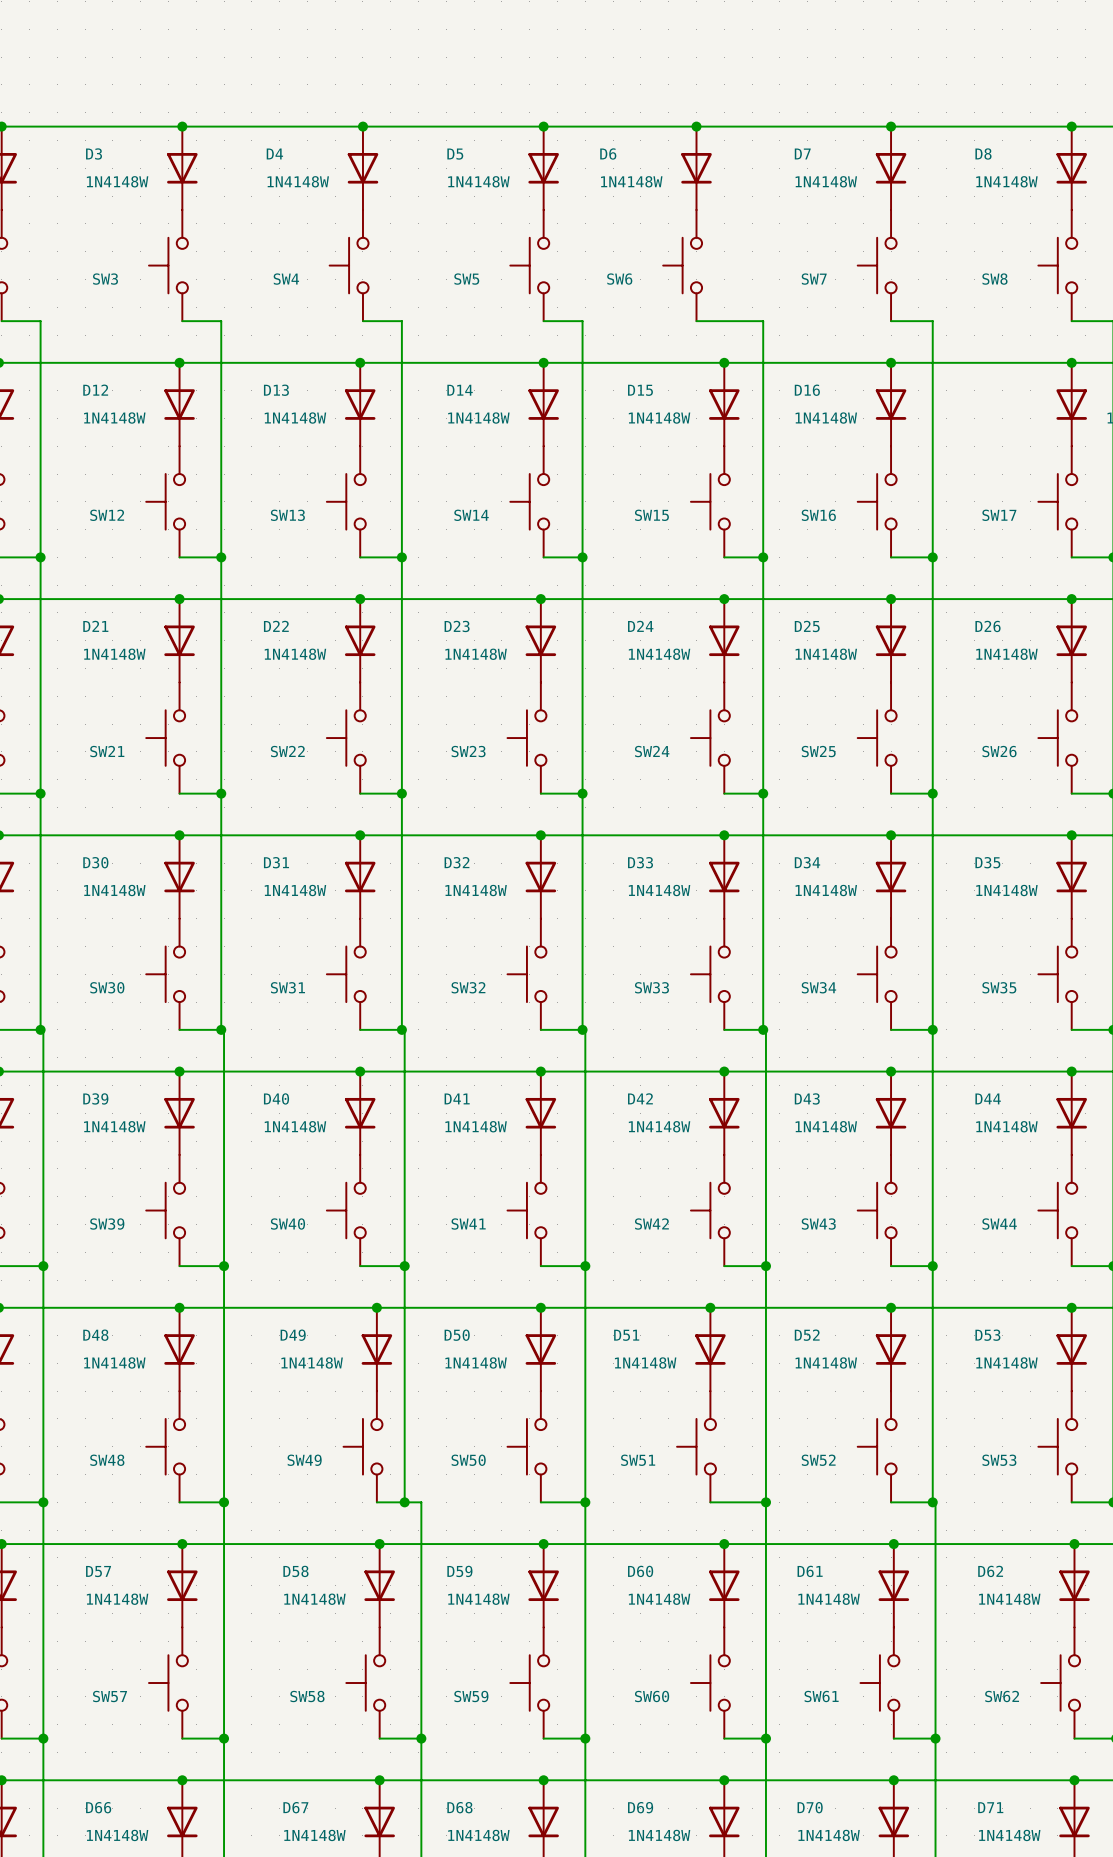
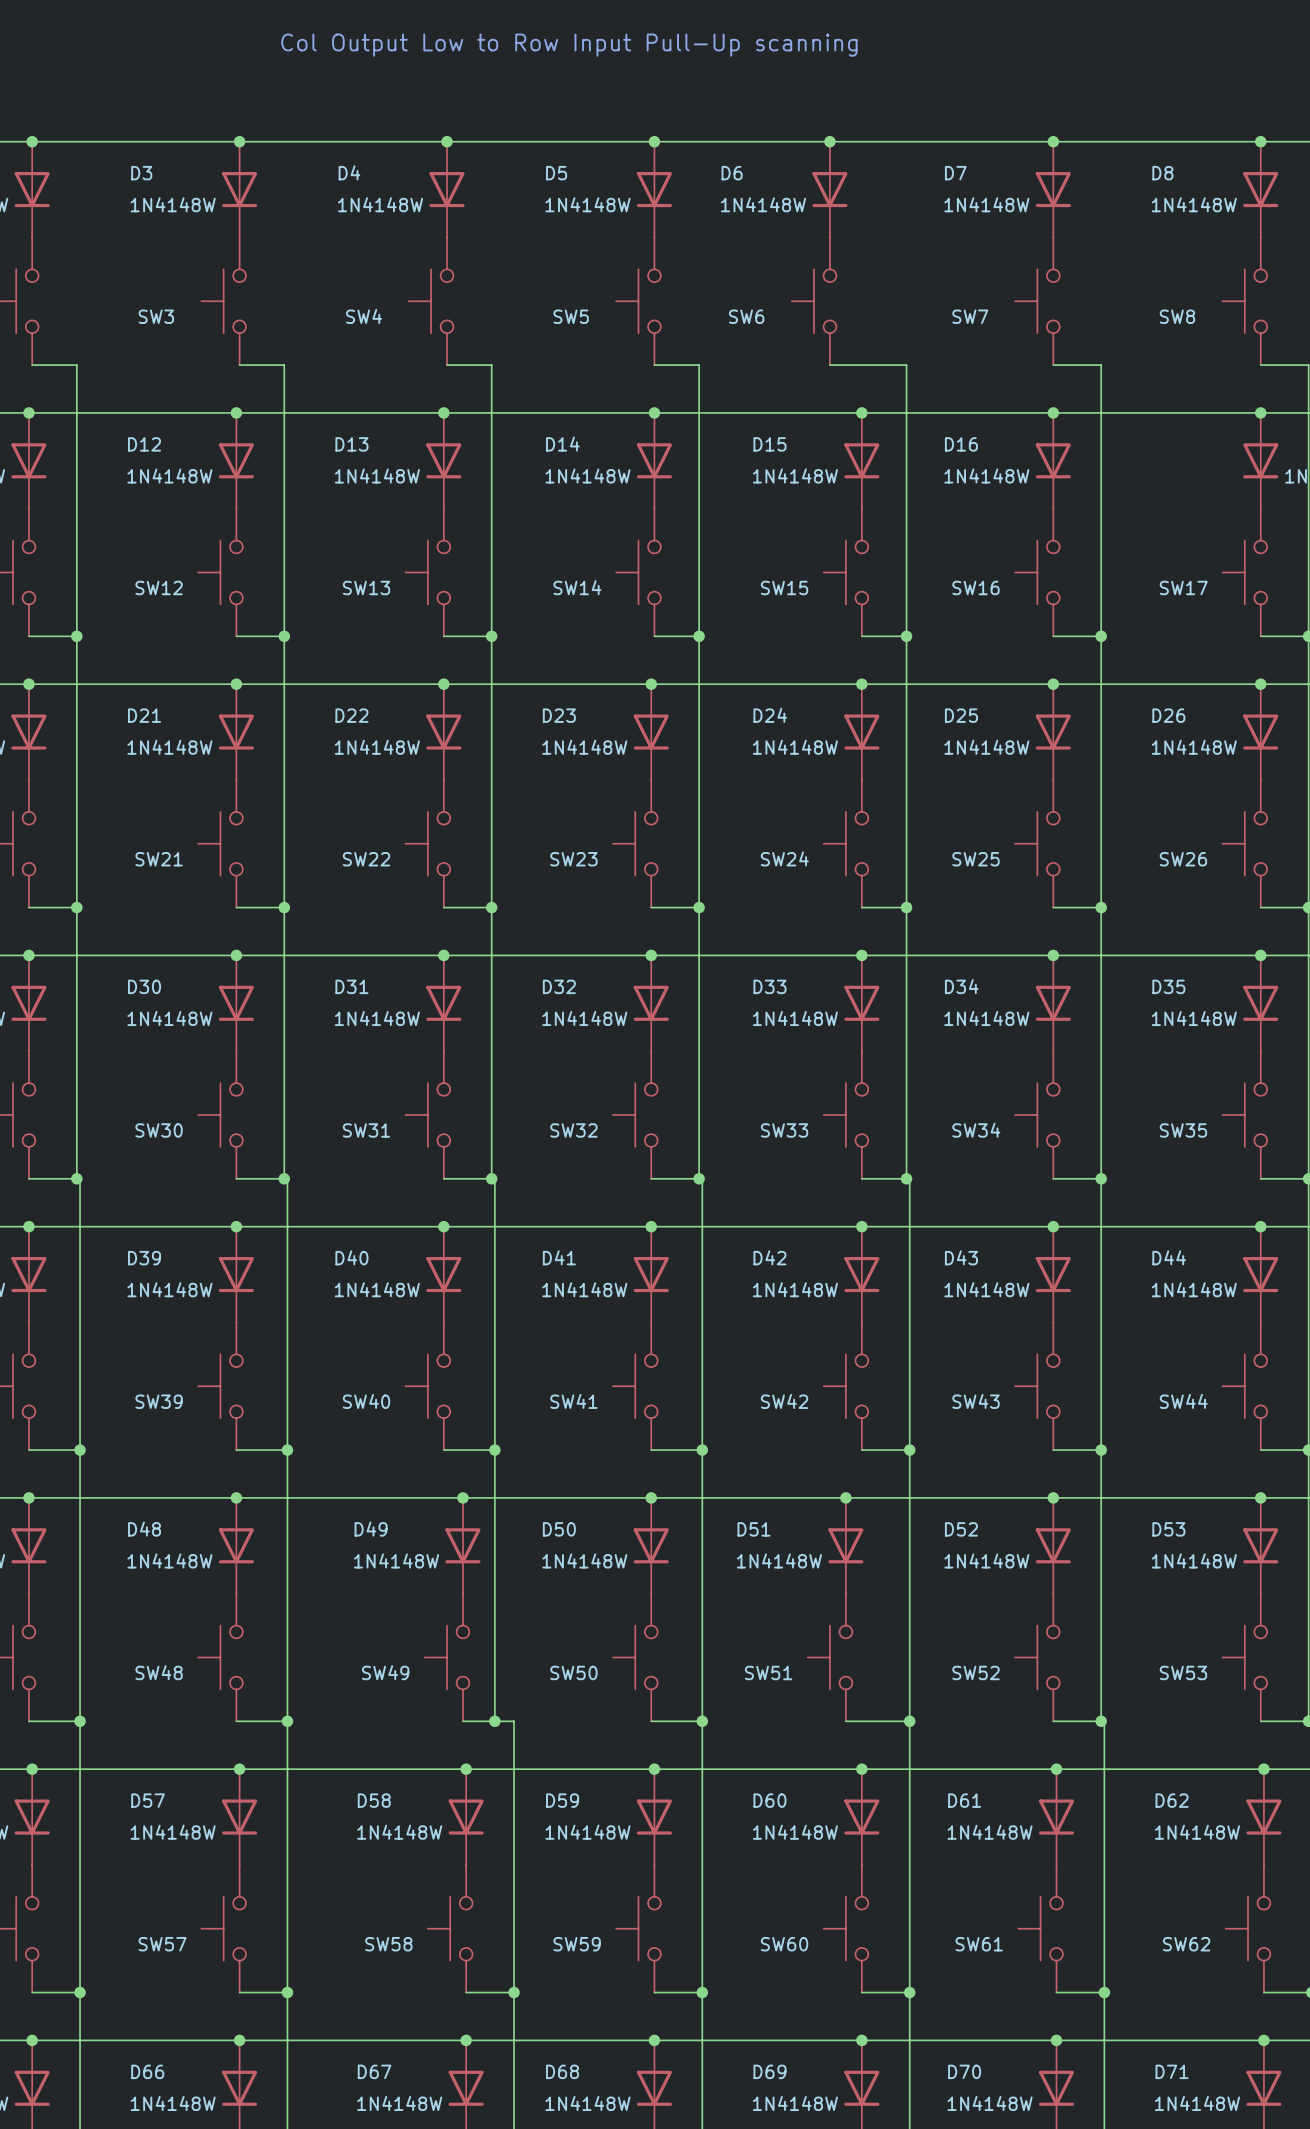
text: none -> Col Output Low to Row Input Pull-Up scanning (569, 45)

